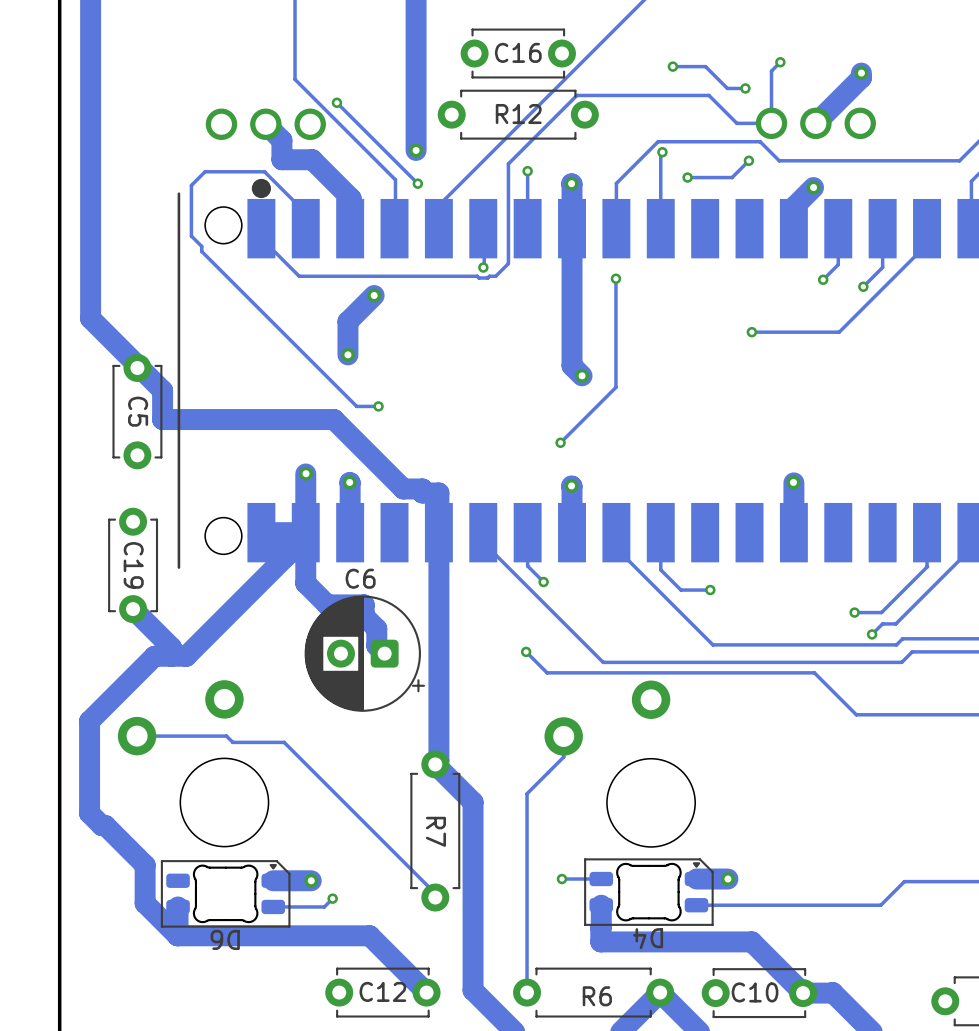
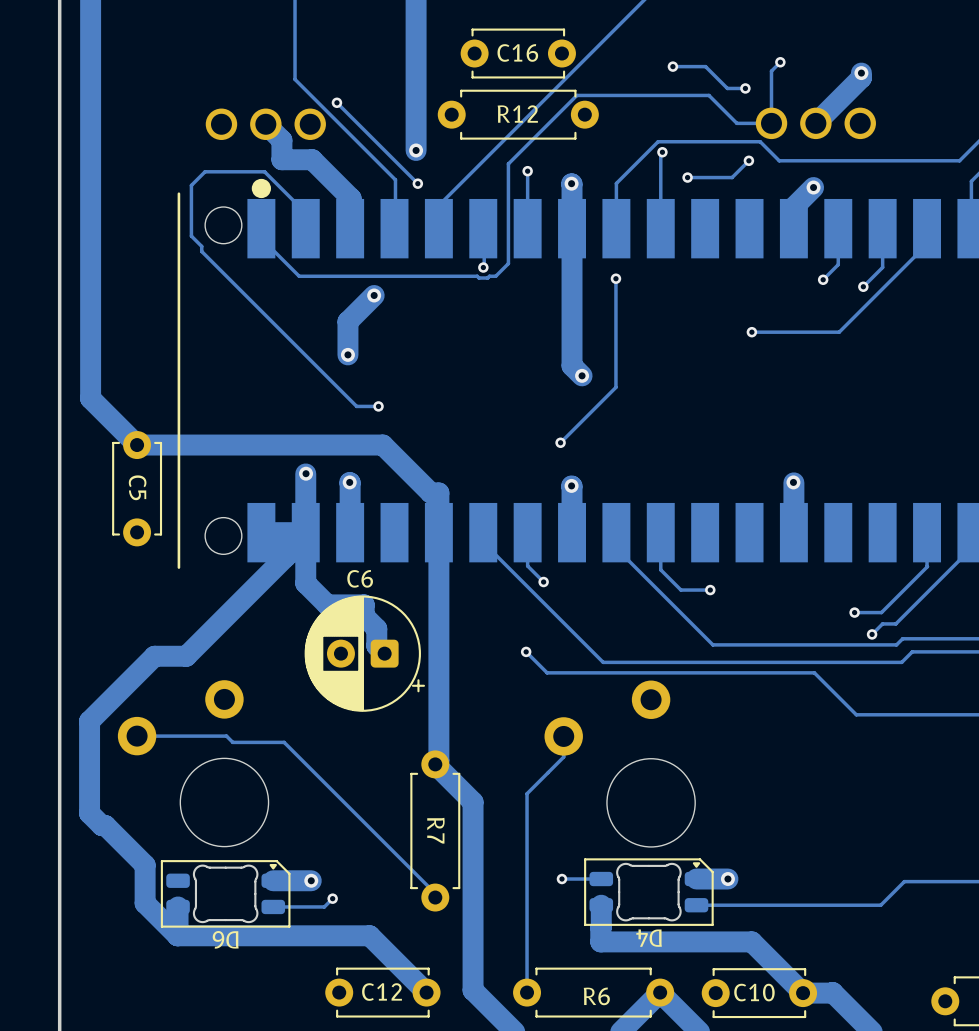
track: (90, 318) (162, 390) (162, 419) (333, 419) (403, 488) (422, 488) (422, 492) (430, 492) -> (90, 318) (90, 398) (137, 445) (382, 445) (430, 492)
C5 position: (137, 411) -> (137, 488)
C19: (133, 565) -> none
track: (133, 609) (171, 647) (171, 656) -> none

